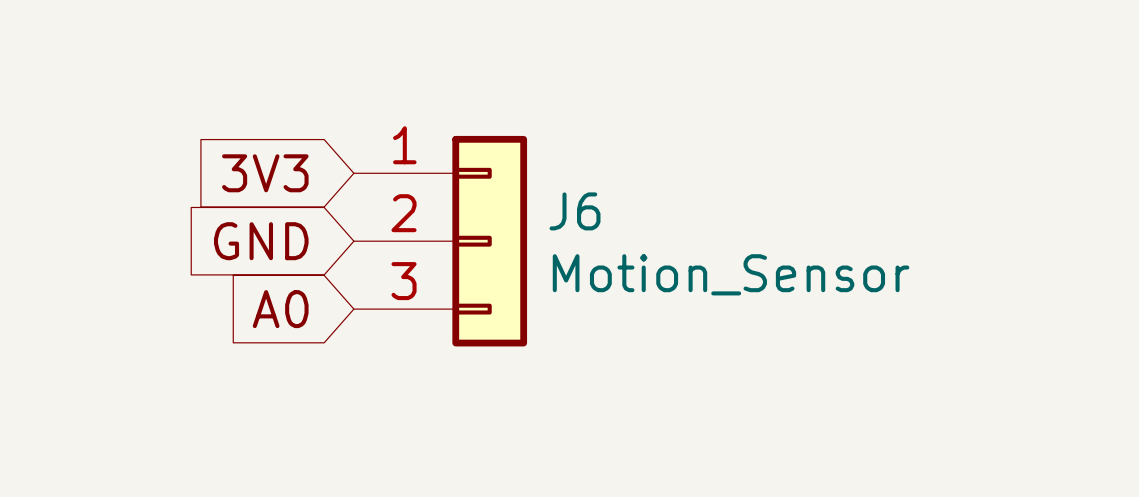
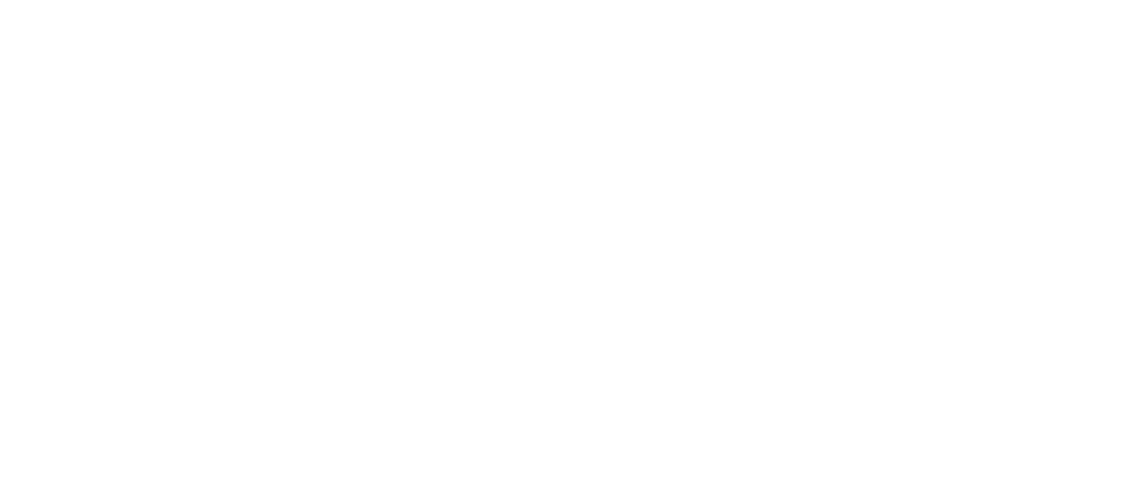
global label: 3V3 (265, 173) -> none
global label: GND (261, 241) -> none
J6: Motion_Sensor (440, 241) -> none
global label: A0 (280, 309) -> none

